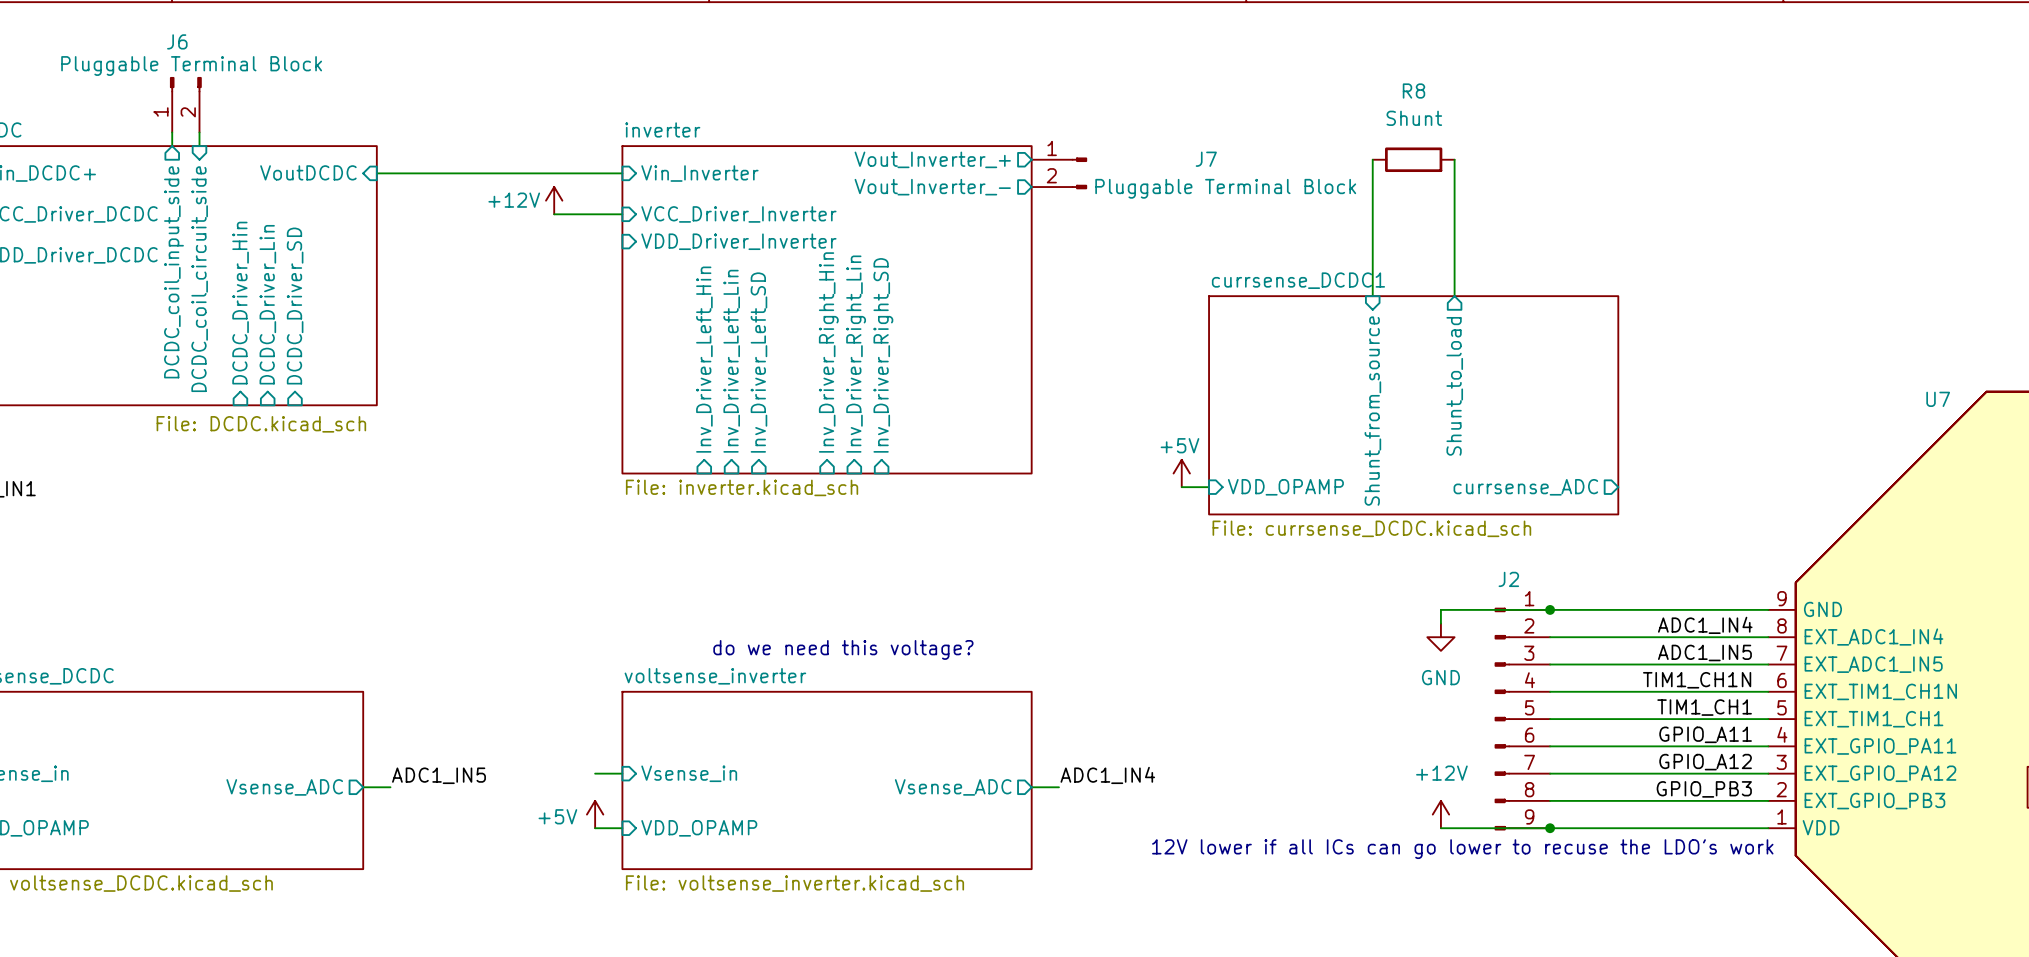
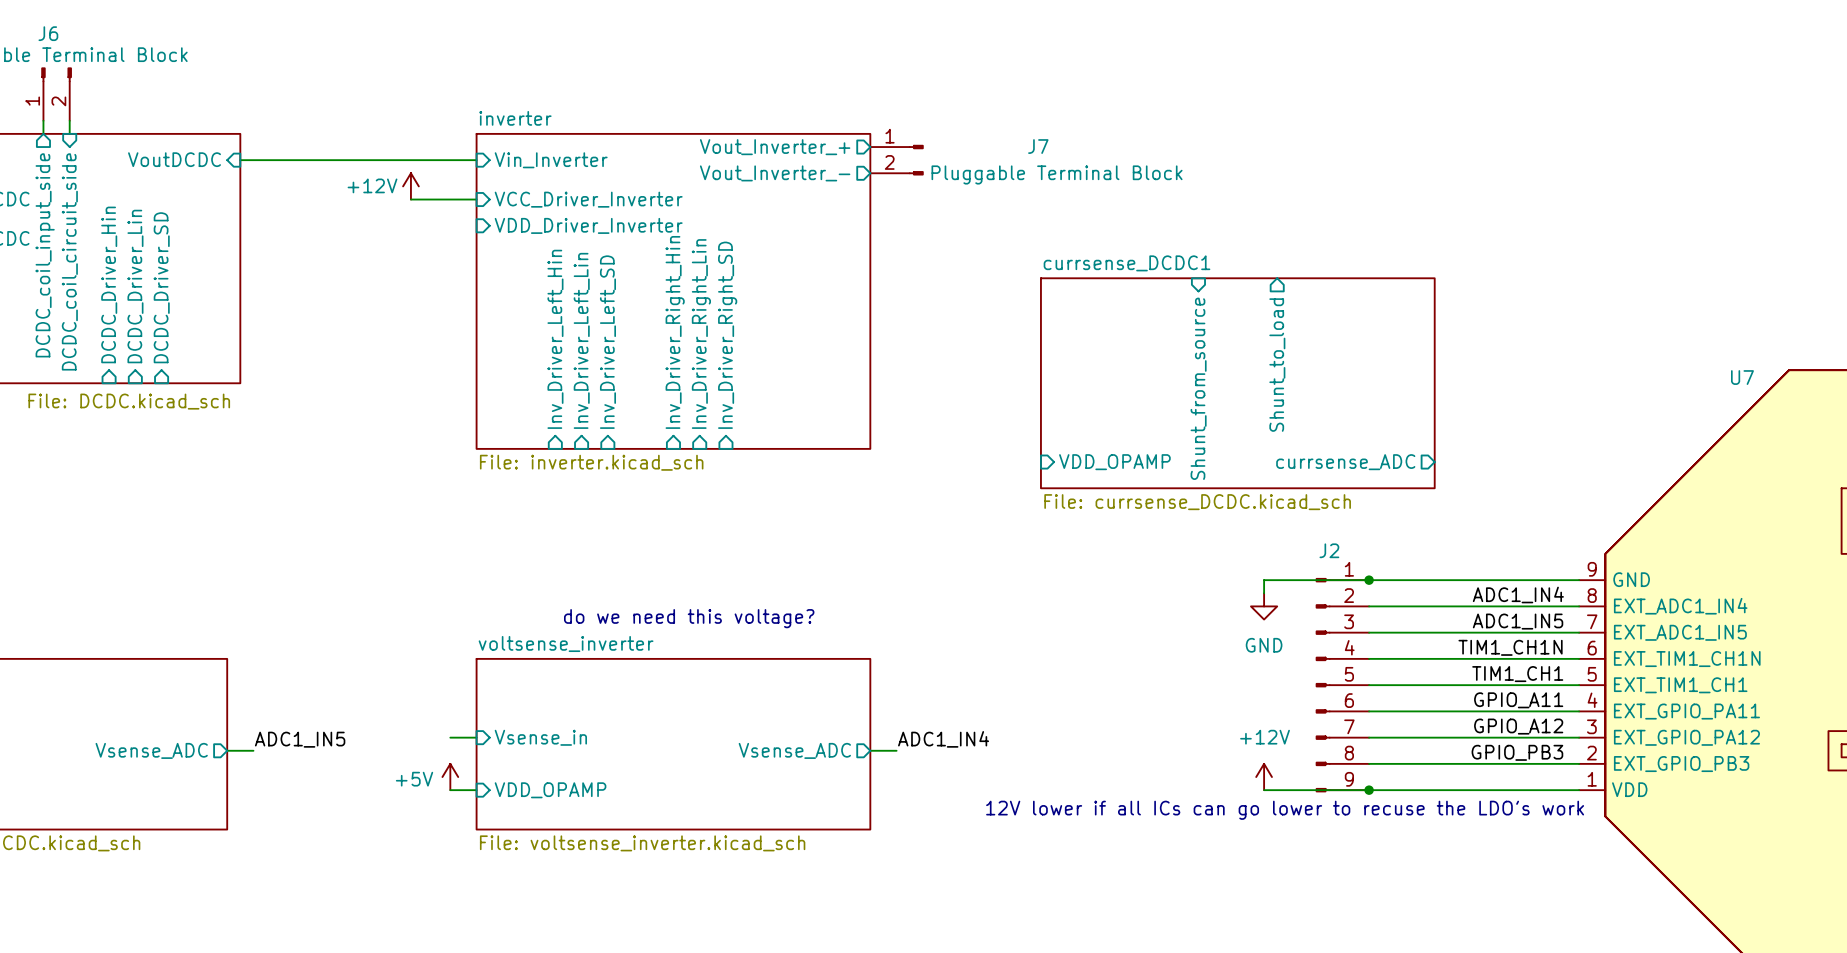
wire: (1372, 159) (1372, 296) -> none
R8: Shunt (1413, 159) -> none
wire: (1454, 159) (1454, 296) -> none
power symbol: +5V (1181, 473) -> none
wire: (1181, 487) (1209, 487) -> none

